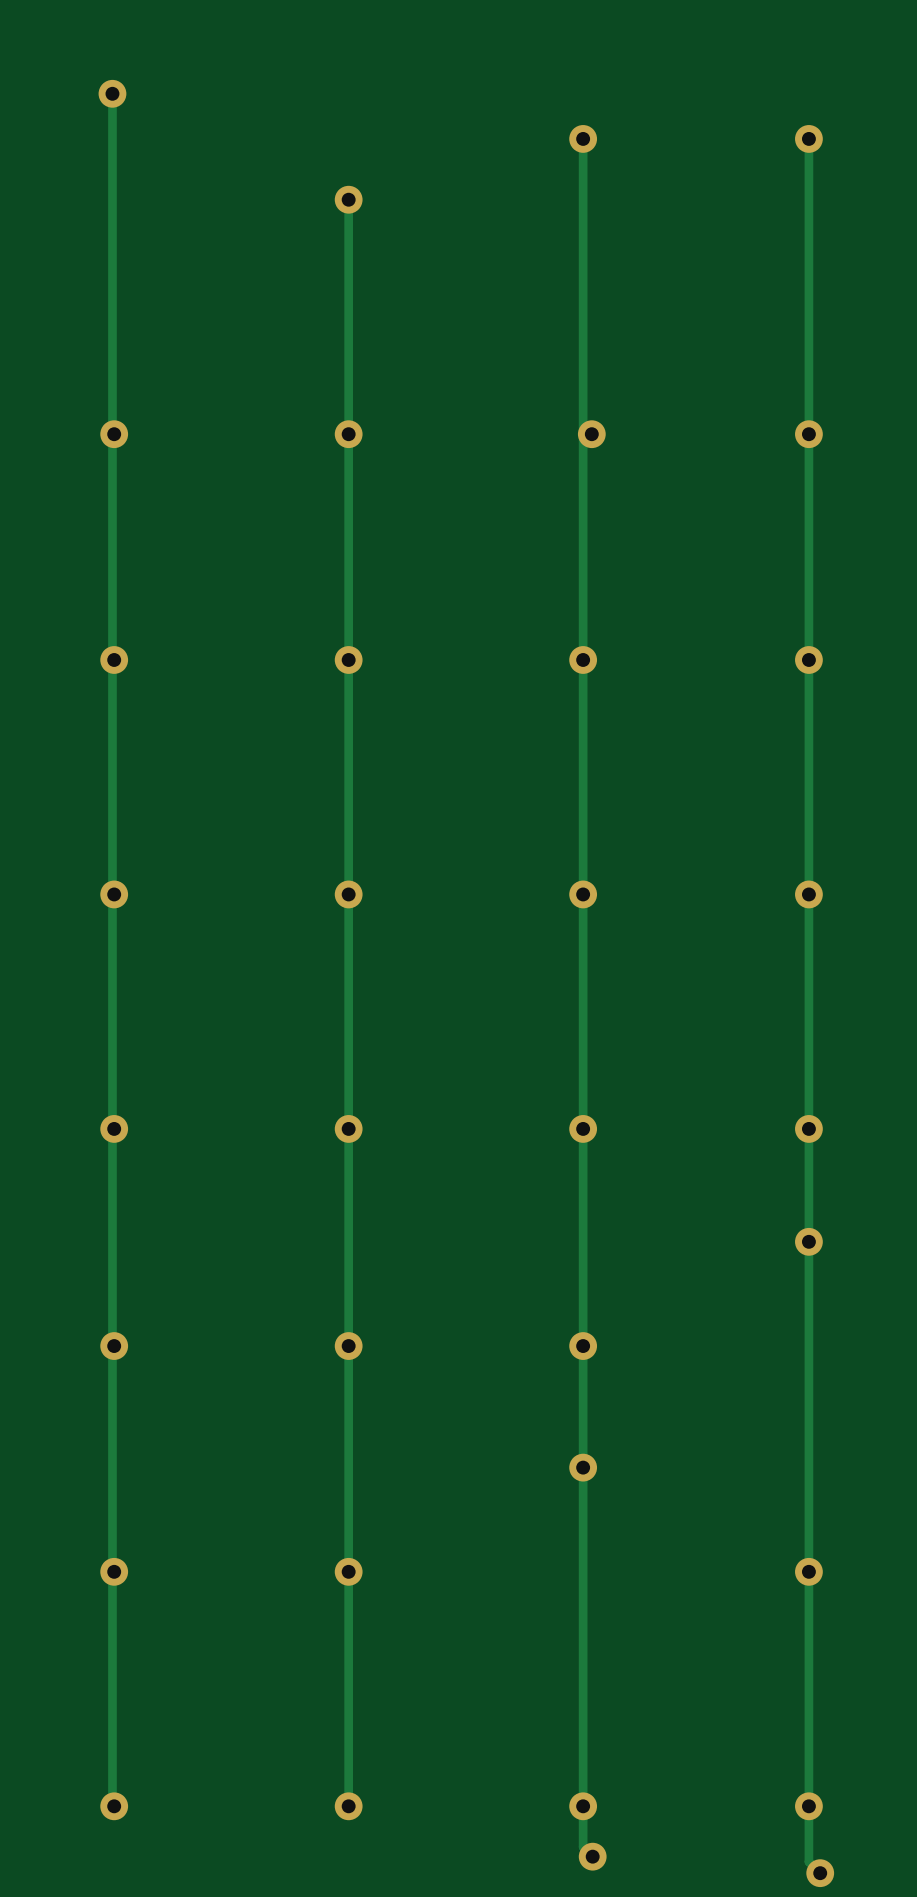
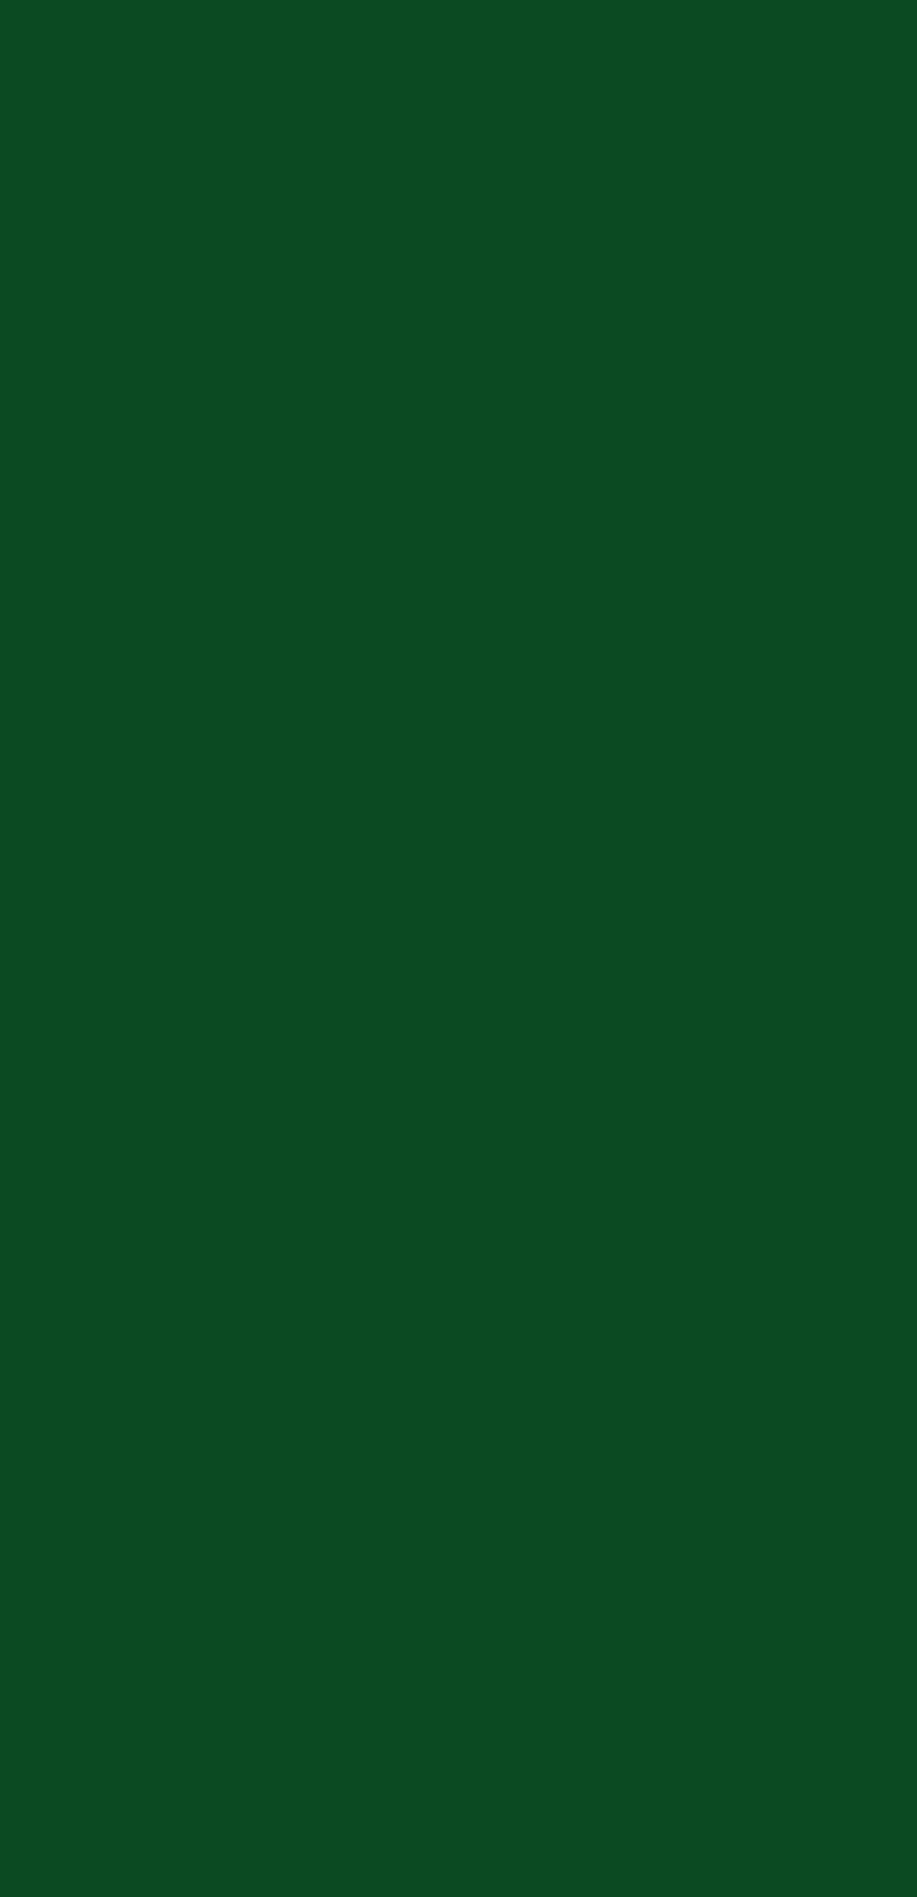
track: (112, 93) (112, 1804) -> none
via: (112, 93) -> none
track: (583, 138) (583, 1847) (592, 1856) -> none
via: (583, 138) -> none
track: (808, 138) (808, 1861) (820, 1873) -> none
via: (808, 138) -> none
track: (348, 199) (348, 1806) -> none
via: (348, 199) -> none
via: (114, 434) -> none
via: (348, 434) -> none
via: (591, 434) -> none
via: (808, 434) -> none
via: (114, 659) -> none
via: (348, 659) -> none
via: (583, 659) -> none
via: (808, 659) -> none
via: (114, 894) -> none
via: (348, 894) -> none
via: (583, 894) -> none
via: (808, 894) -> none
via: (114, 1128) -> none
via: (348, 1128) -> none
via: (583, 1128) -> none
via: (808, 1128) -> none
via: (808, 1241) -> none
via: (114, 1346) -> none
via: (348, 1346) -> none
via: (583, 1346) -> none
via: (583, 1467) -> none
via: (114, 1571) -> none
via: (348, 1571) -> none
via: (808, 1571) -> none
via: (114, 1806) -> none
via: (348, 1806) -> none
via: (583, 1806) -> none
via: (808, 1806) -> none
via: (592, 1856) -> none
via: (820, 1873) -> none

